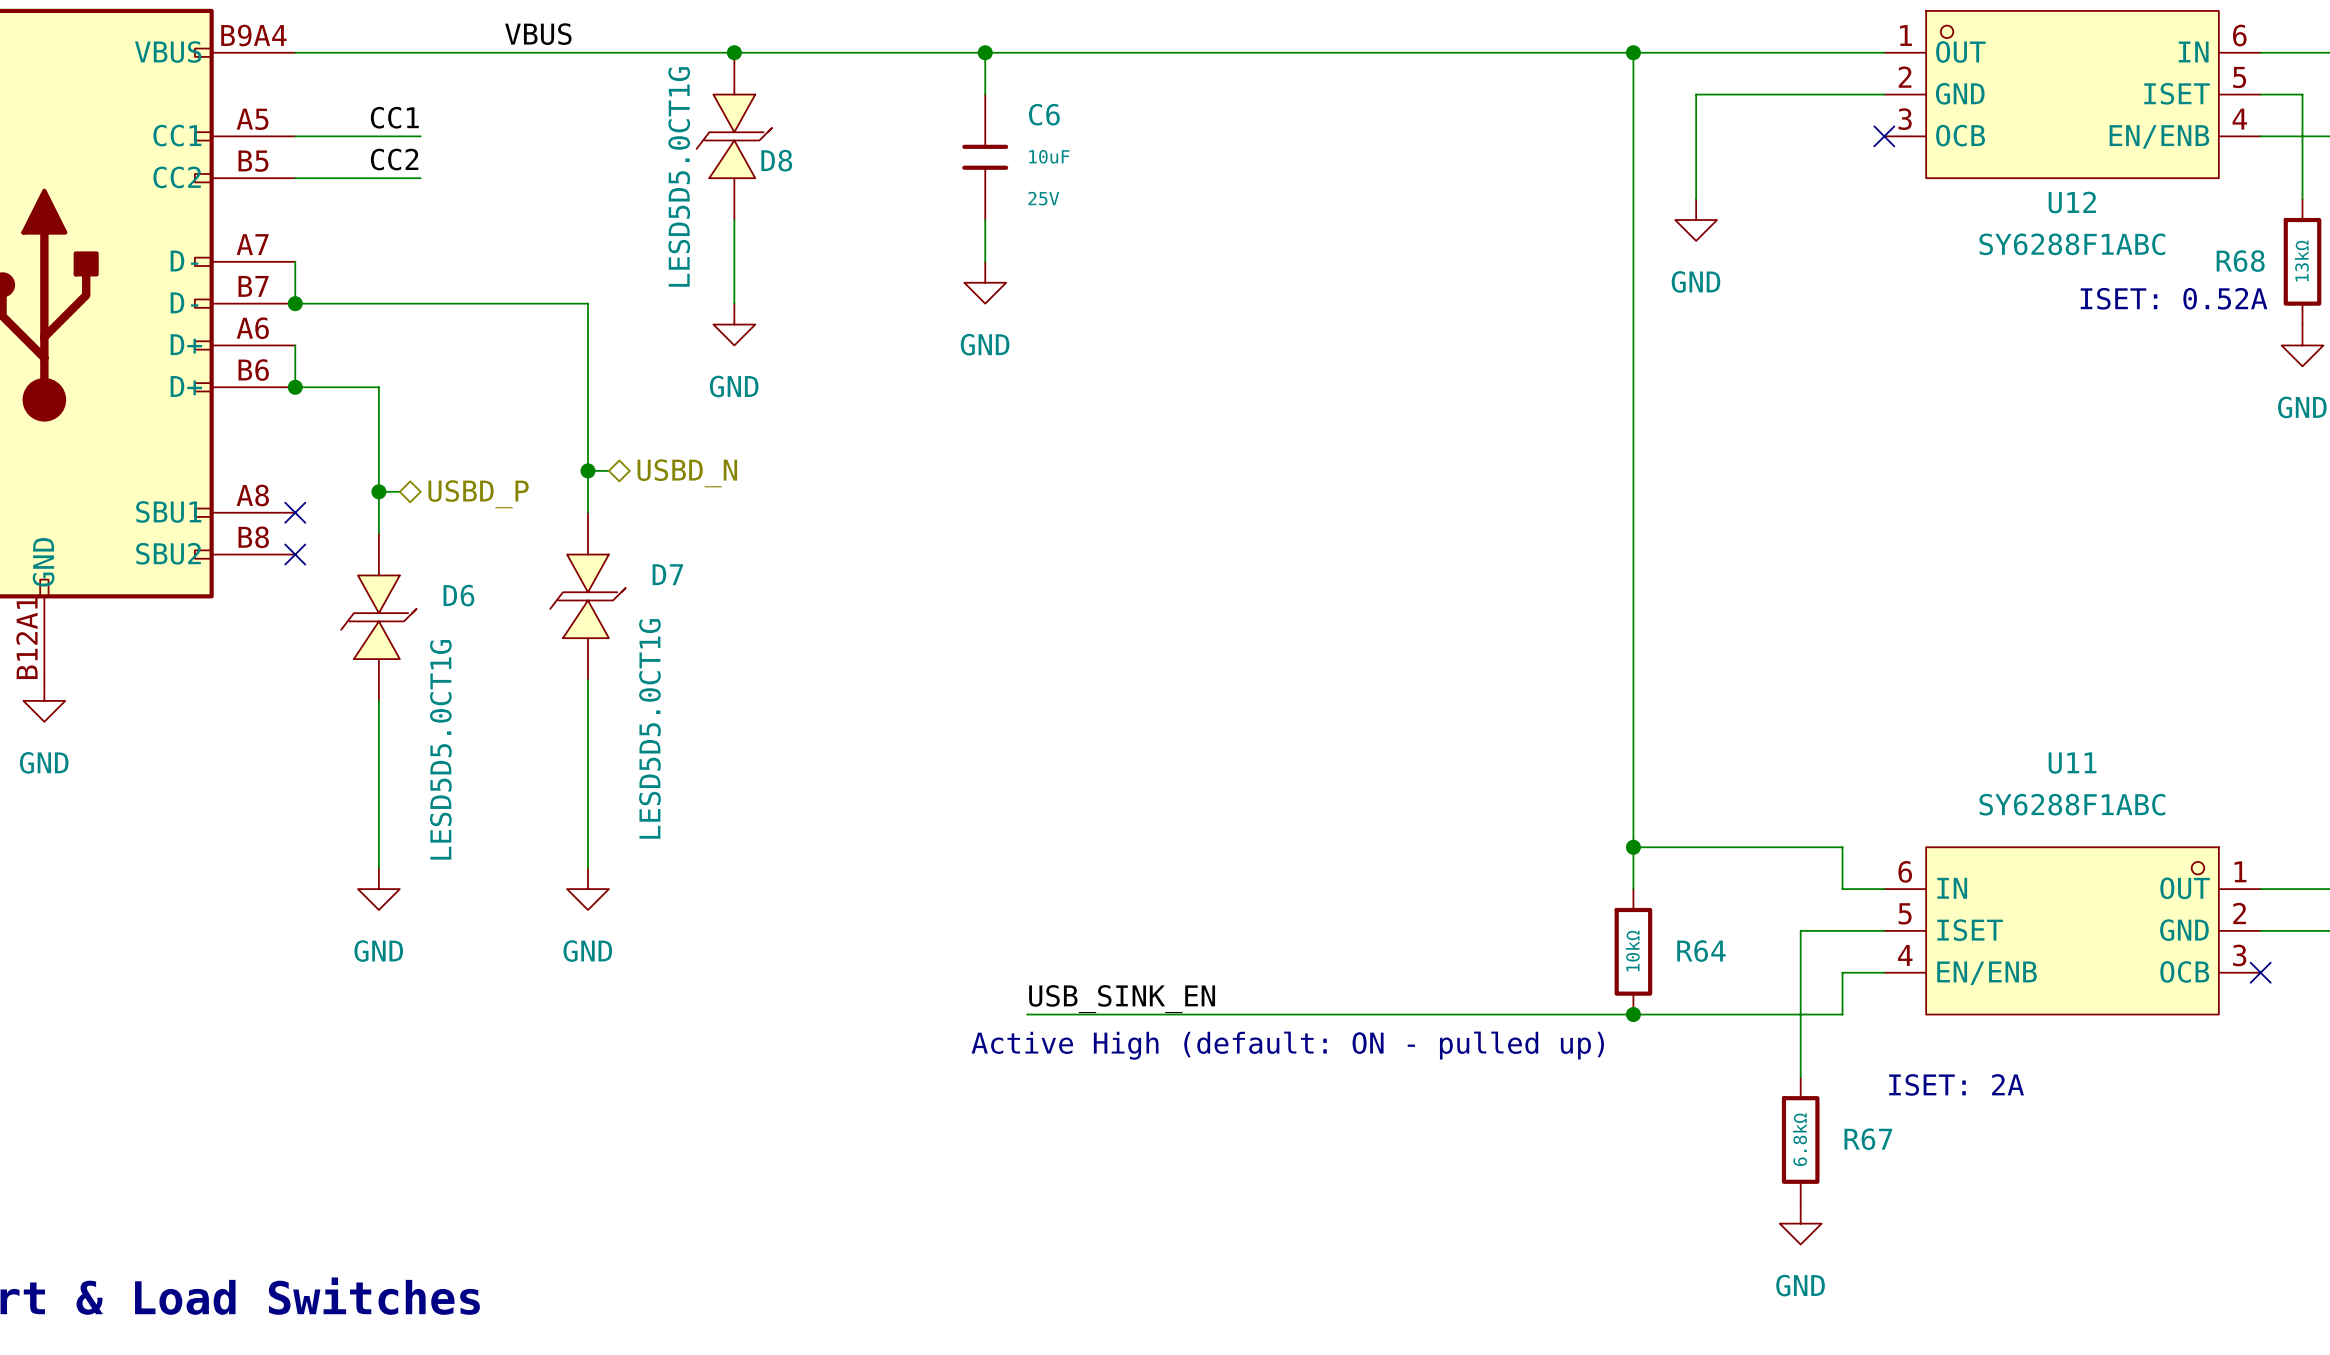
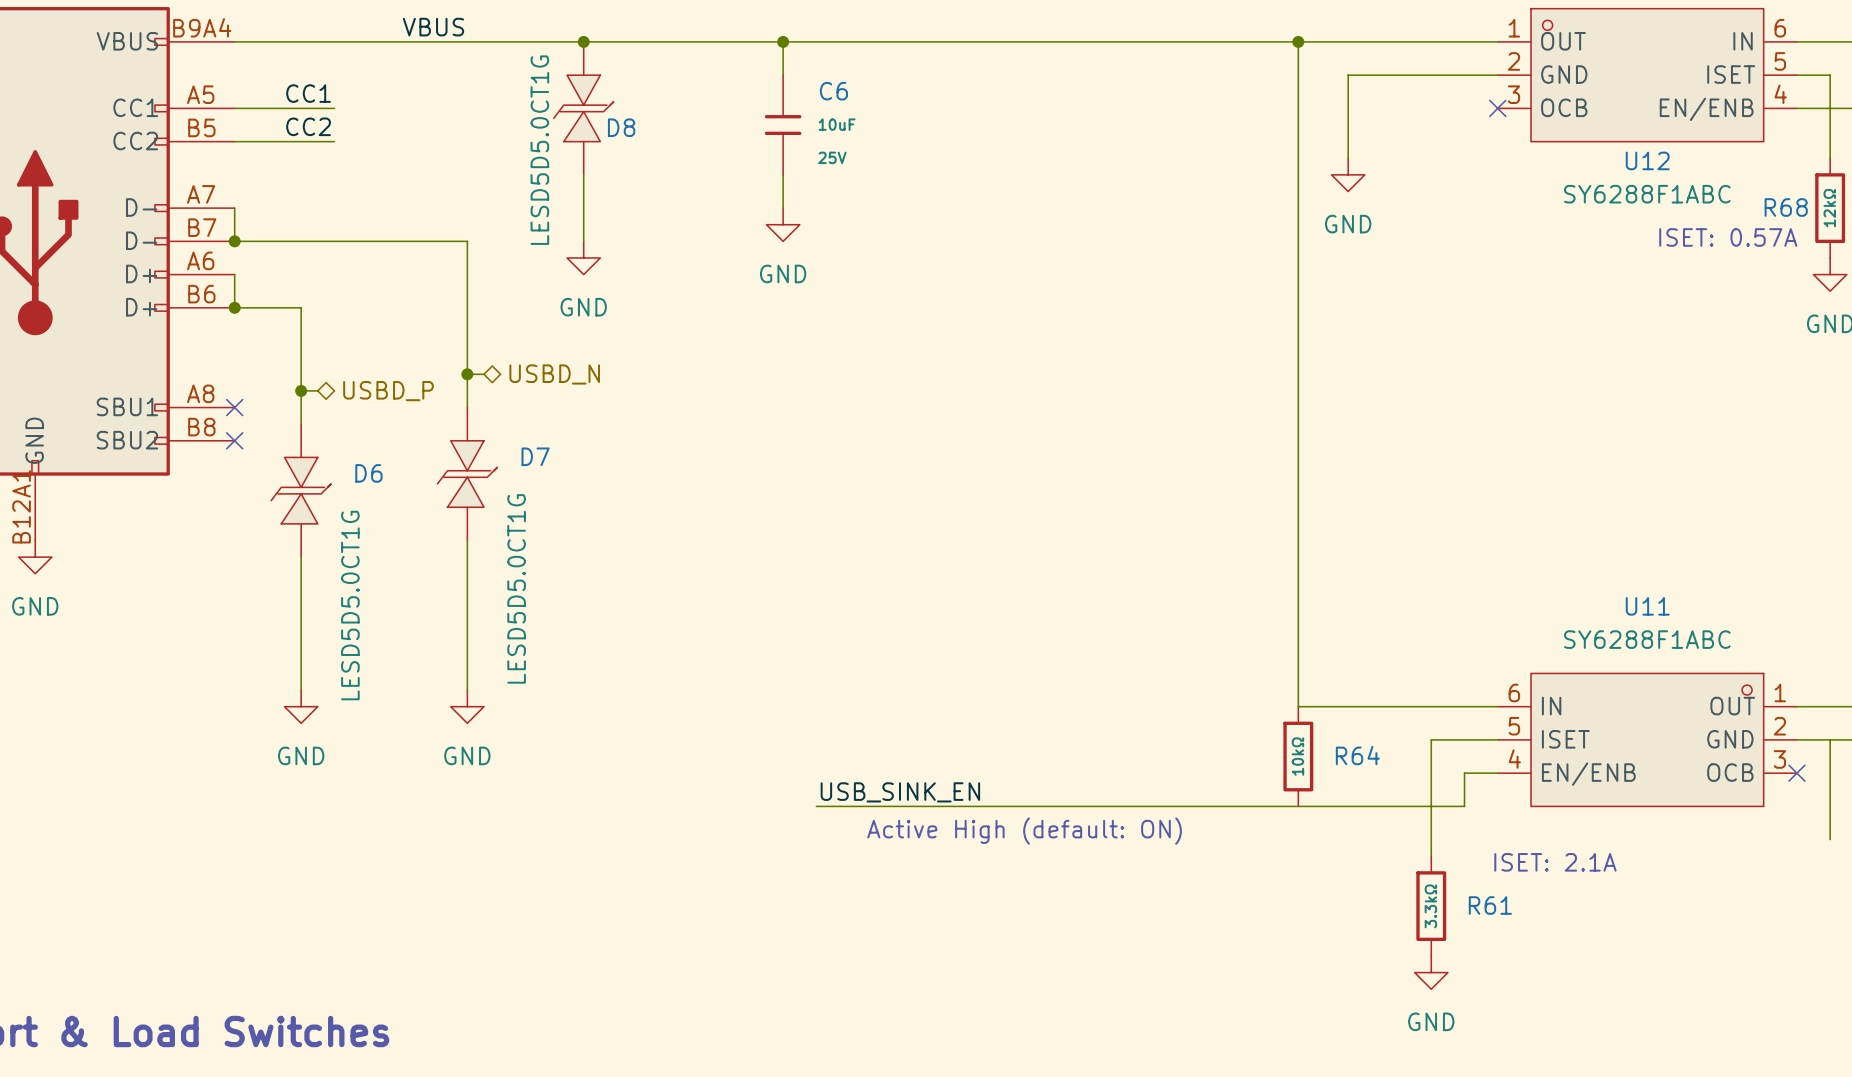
R68 value: 13kΩ (2301, 261) -> 12kΩ (1829, 208)
text: ISET: 0.52A (2174, 298) -> ISET: 0.57A (1728, 237)
wire: (1633, 847) (1842, 847) (1842, 889) -> (1298, 706) (1464, 706)
junction: (1633, 847) -> none
wire: none -> (1830, 739) (1830, 839)
junction: (1633, 1014) -> none
text: Active High (default: ON - pulled up) (1287, 1045) -> Active High (default: ON) (1024, 831)
text: ISET: 2A (1956, 1084) -> ISET: 2.1A (1555, 862)
R67 value: 6.8kΩ (1800, 1139) -> 3.3kΩ (1430, 906)
R67 name: R67 (1868, 1139) -> R61 (1490, 905)

